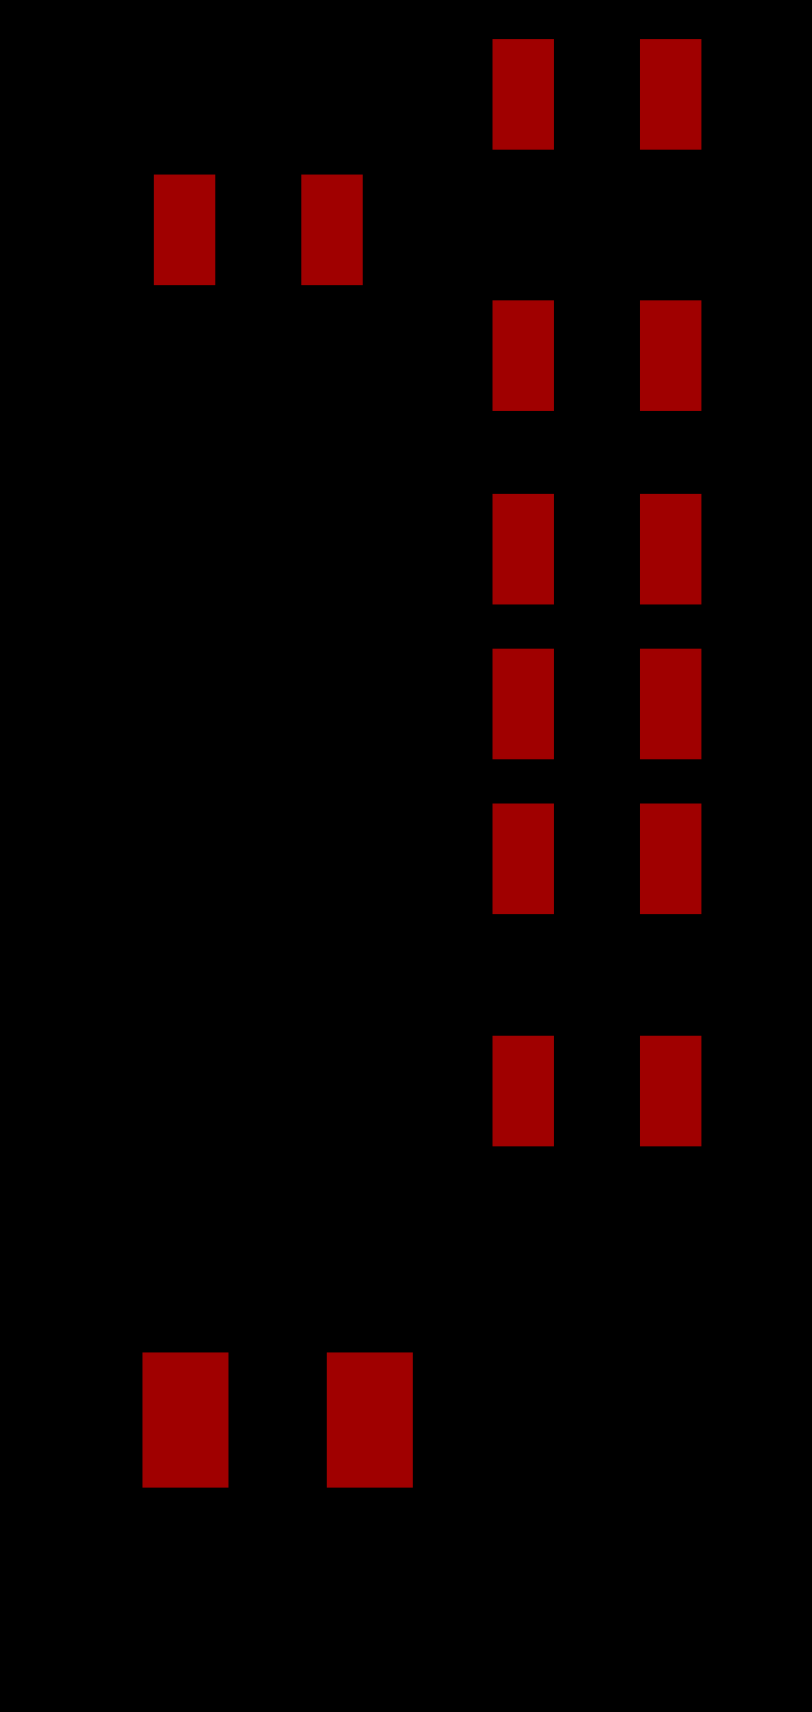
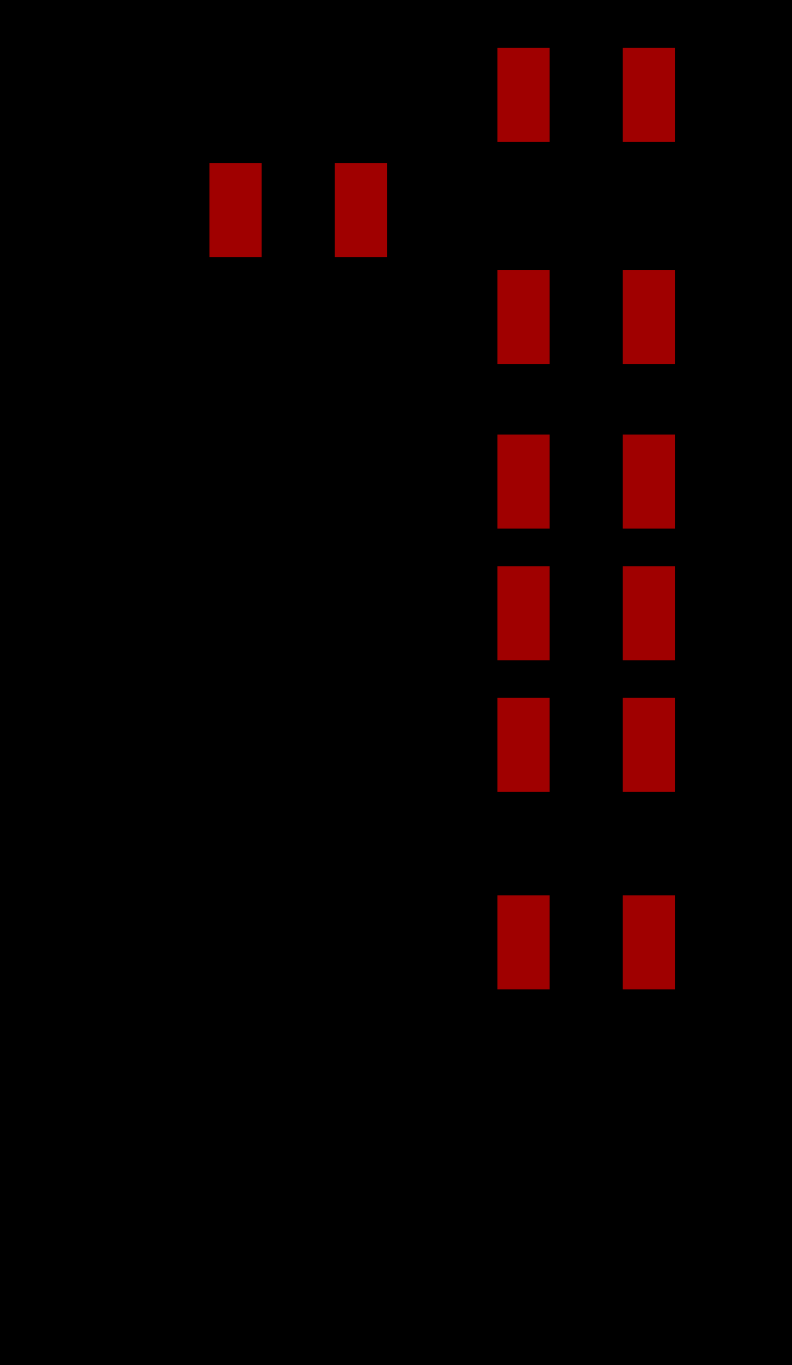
part: (277, 1420) -> none

